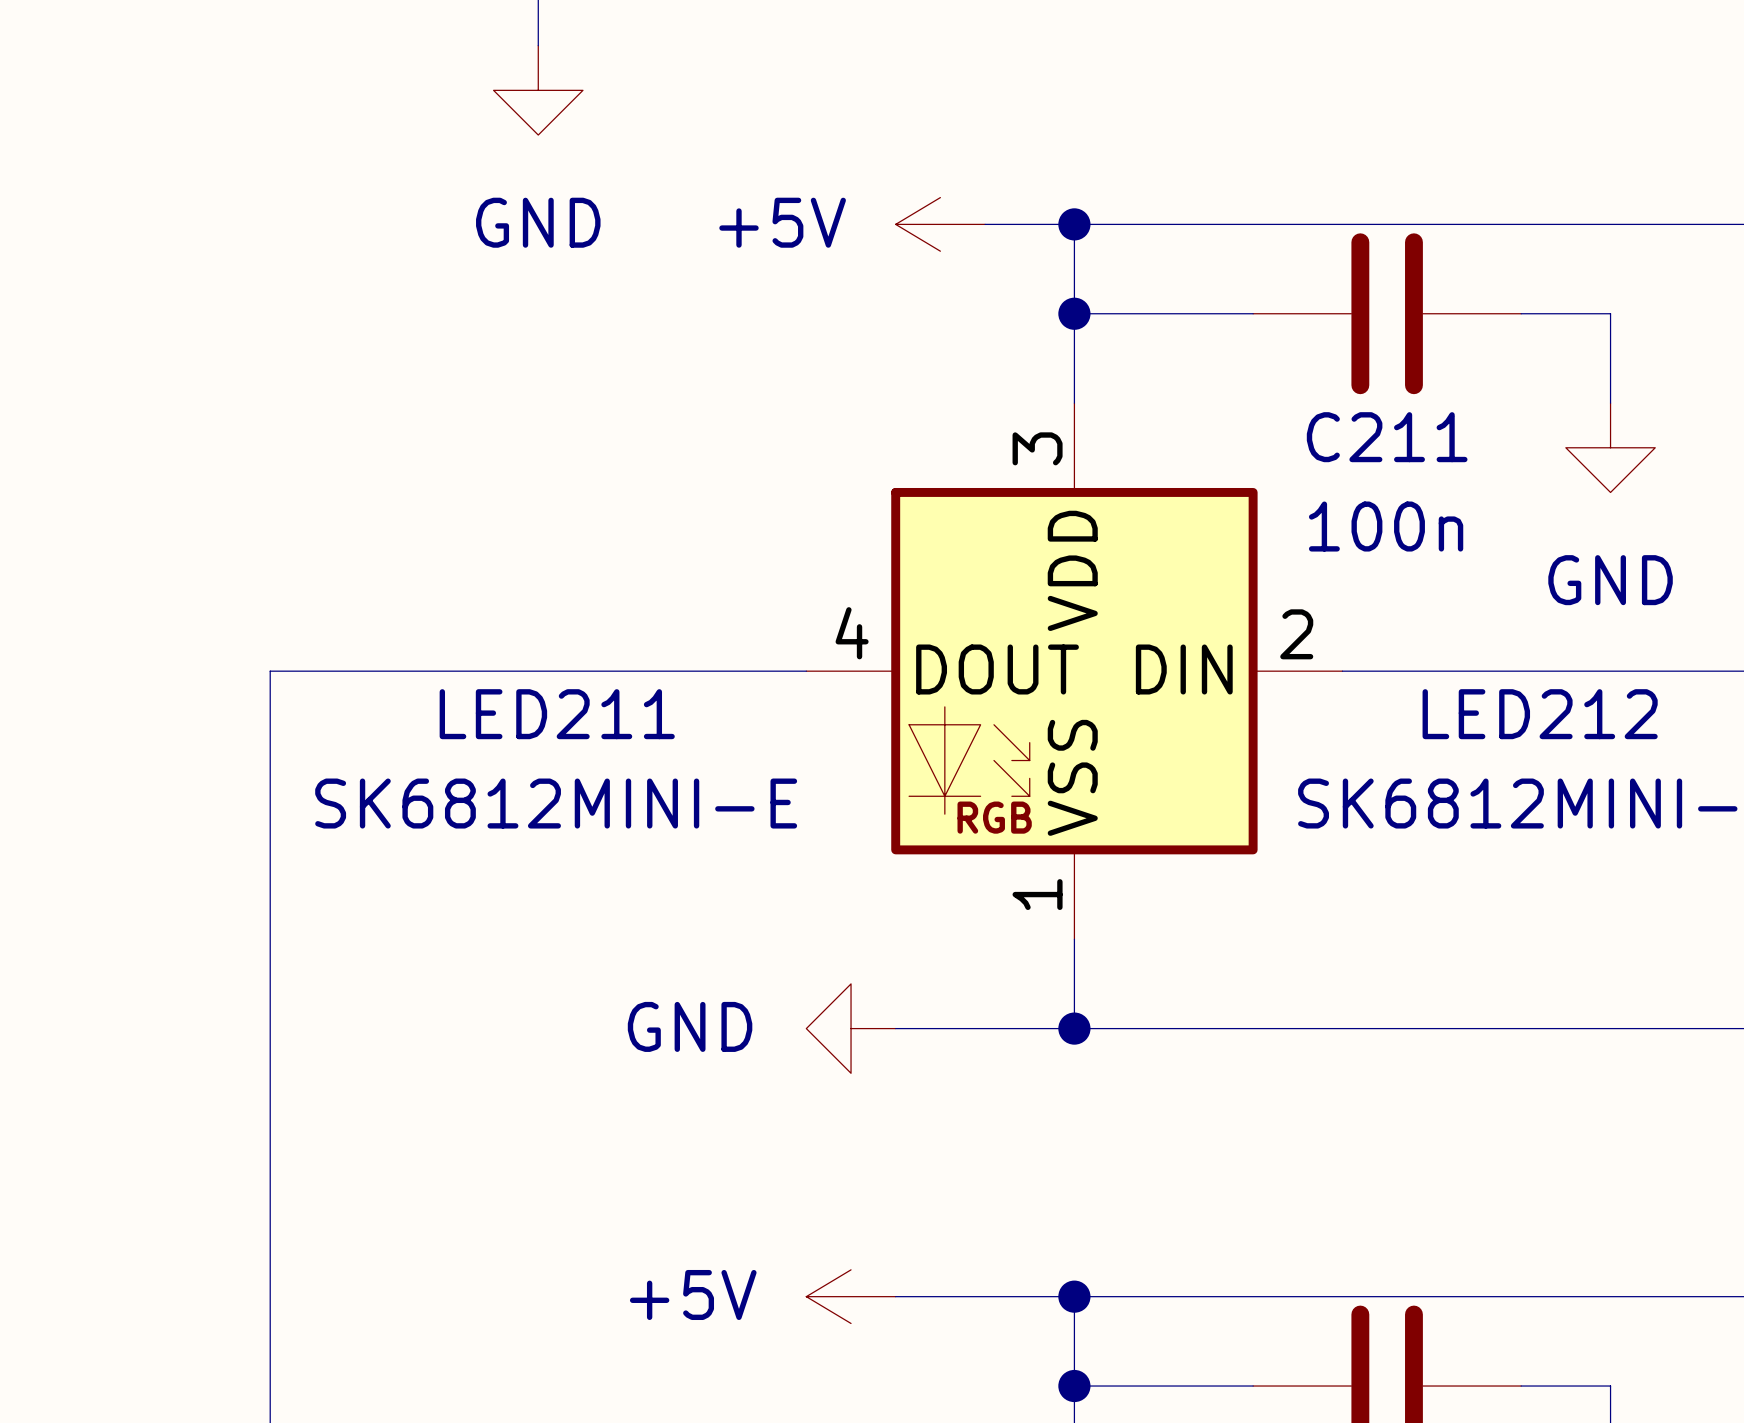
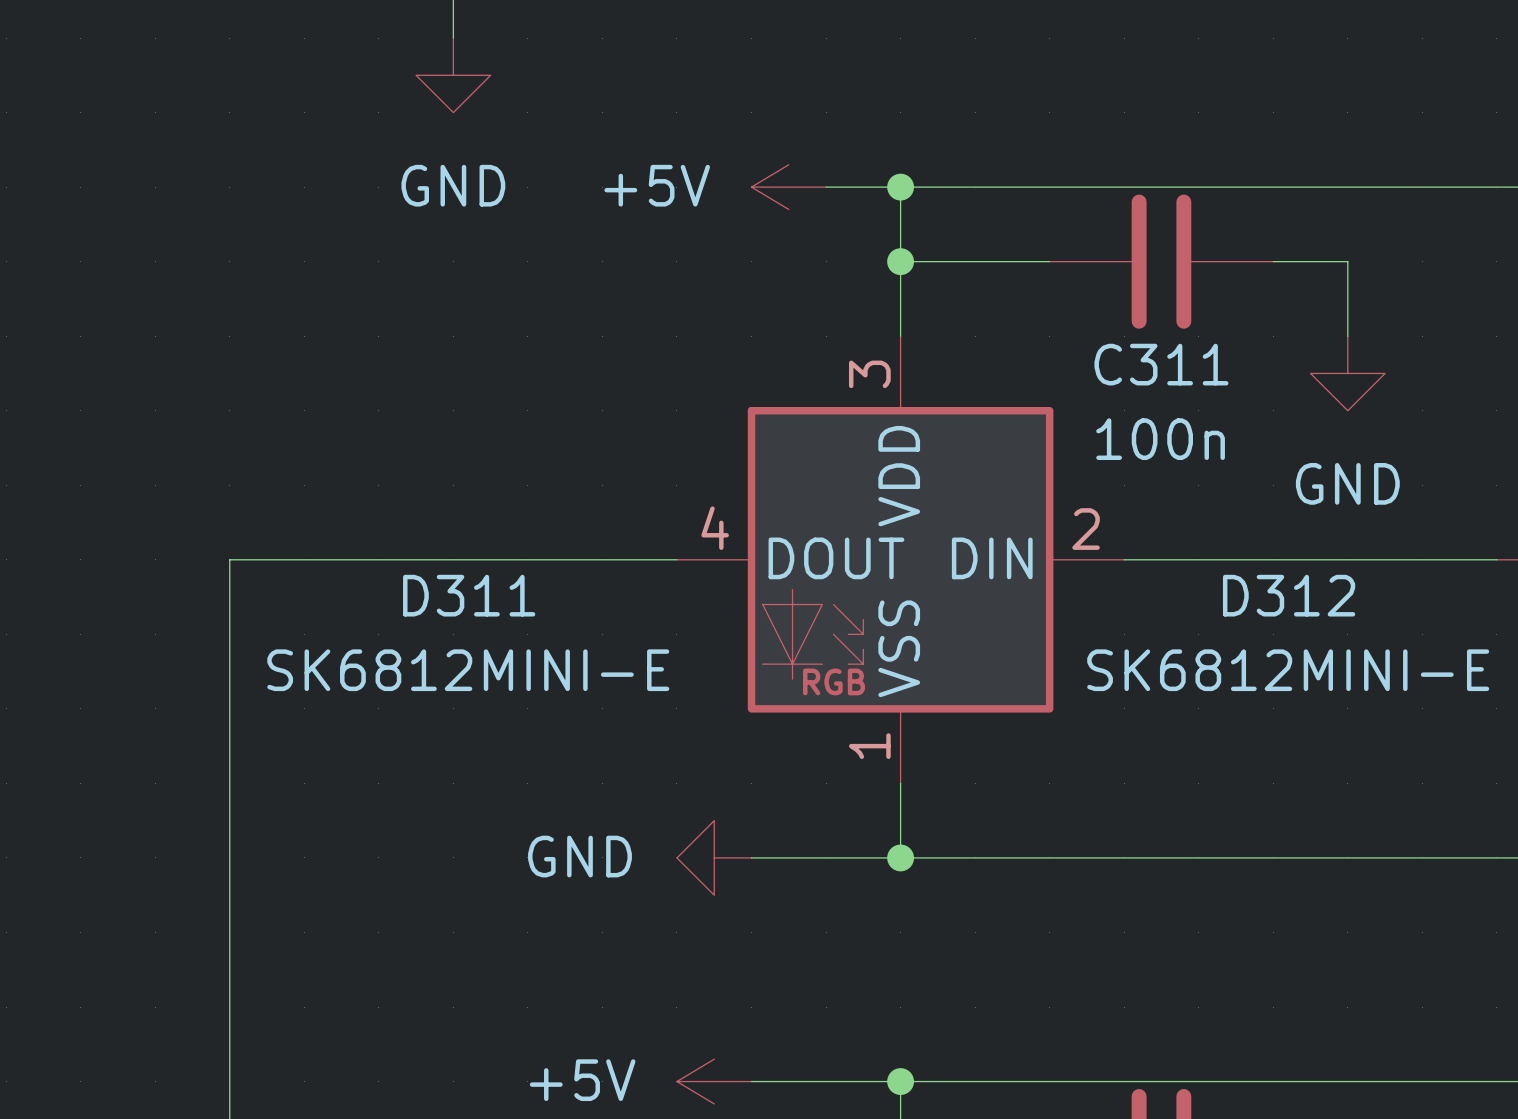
C211 name: C211 (1387, 437) -> C311 (1161, 364)
LED211 name: LED211 (557, 714) -> D311 (469, 595)
LED212 name: LED212 (1540, 714) -> D312 (1289, 595)

